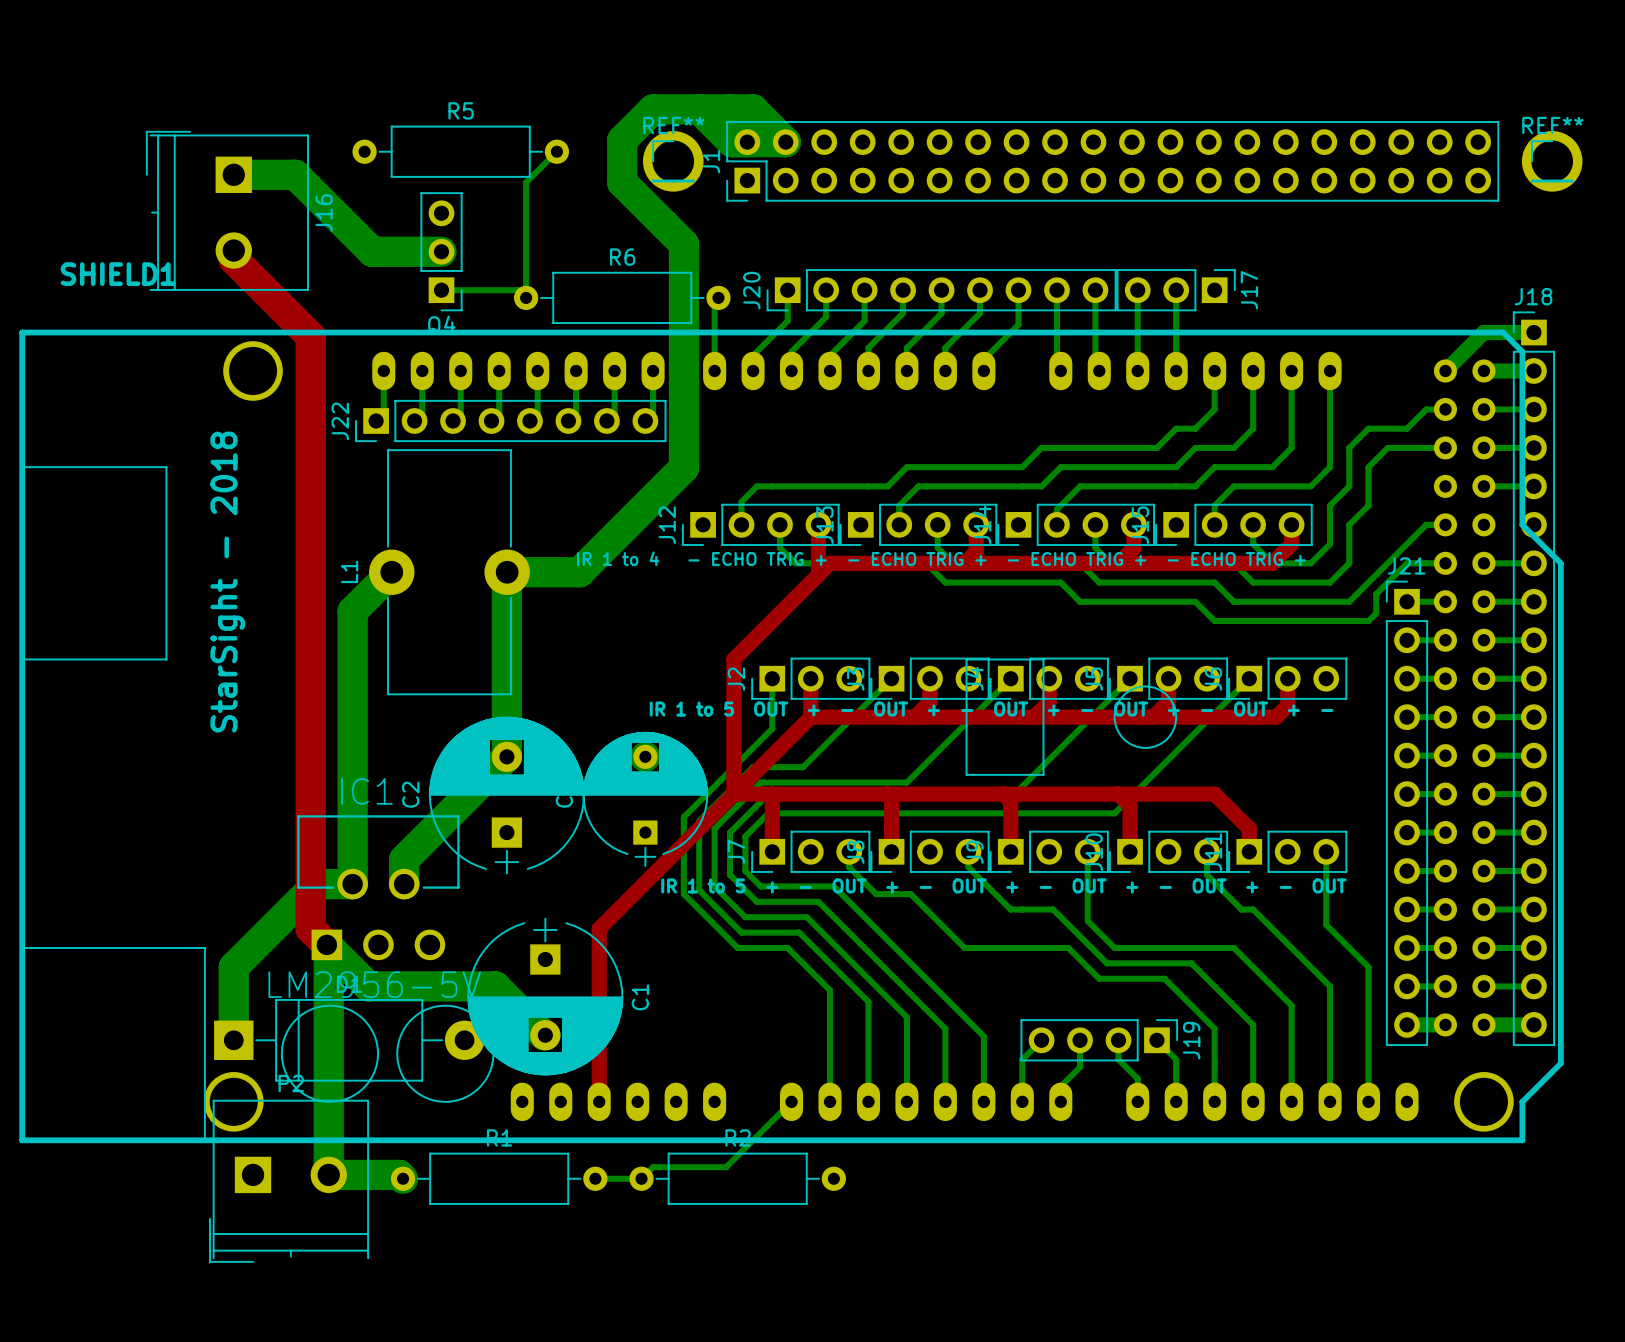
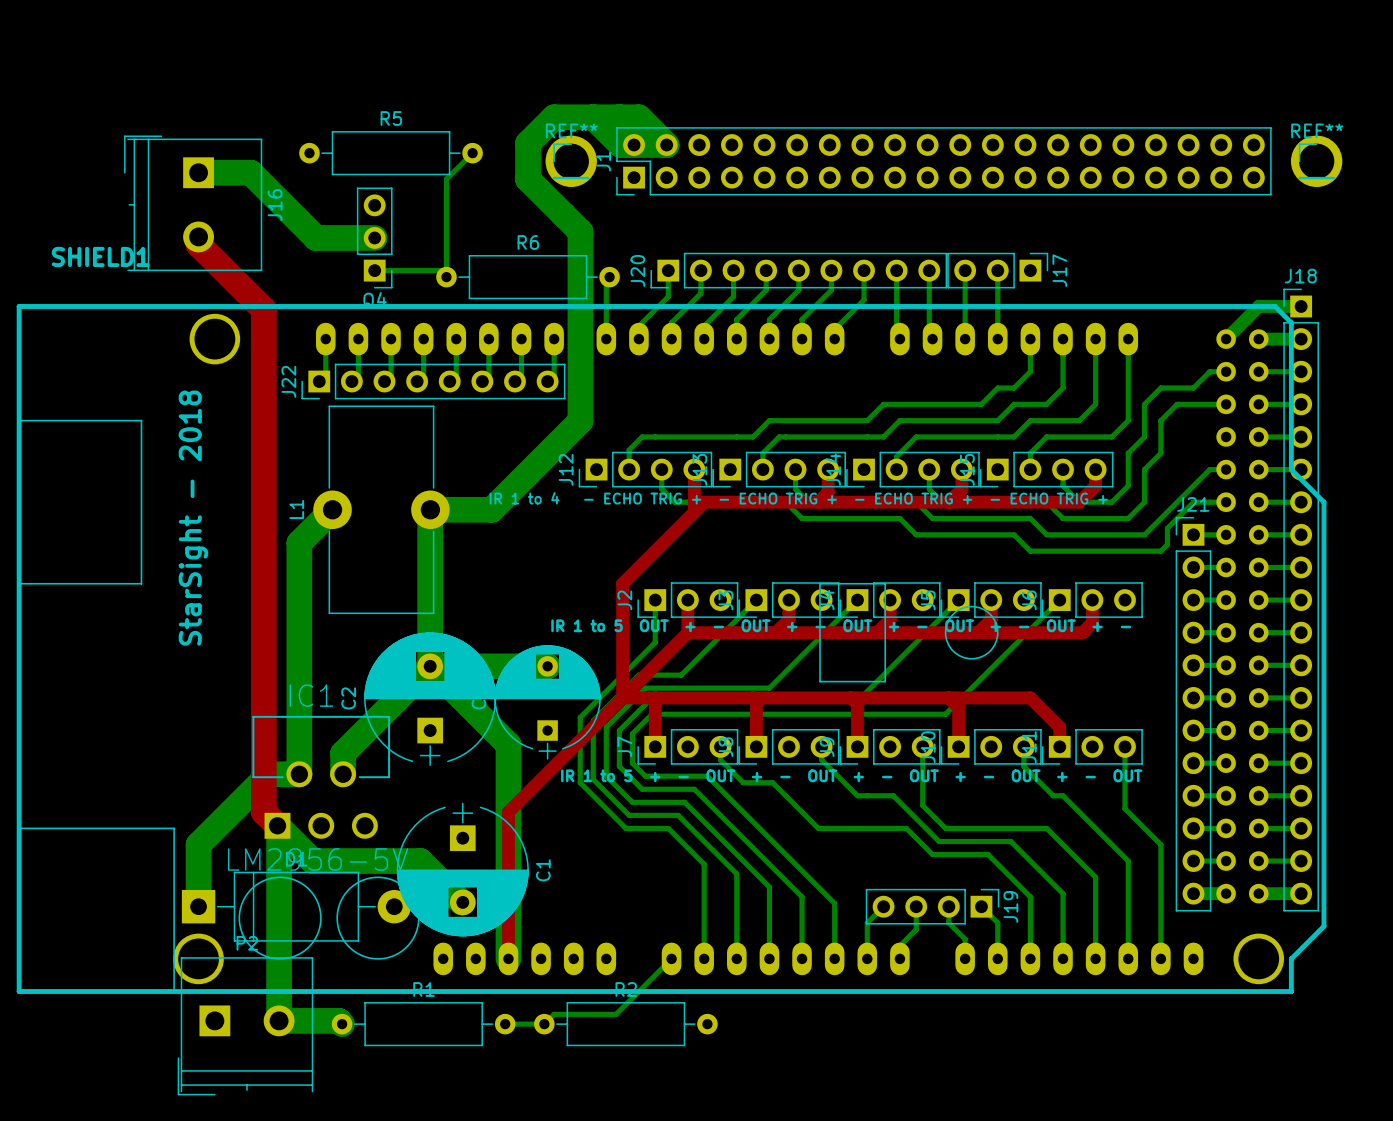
bottom track: none -> (1258, 469) (1301, 469)
bottom track: none -> (547, 666) (430, 666) (508, 744) (508, 958)

